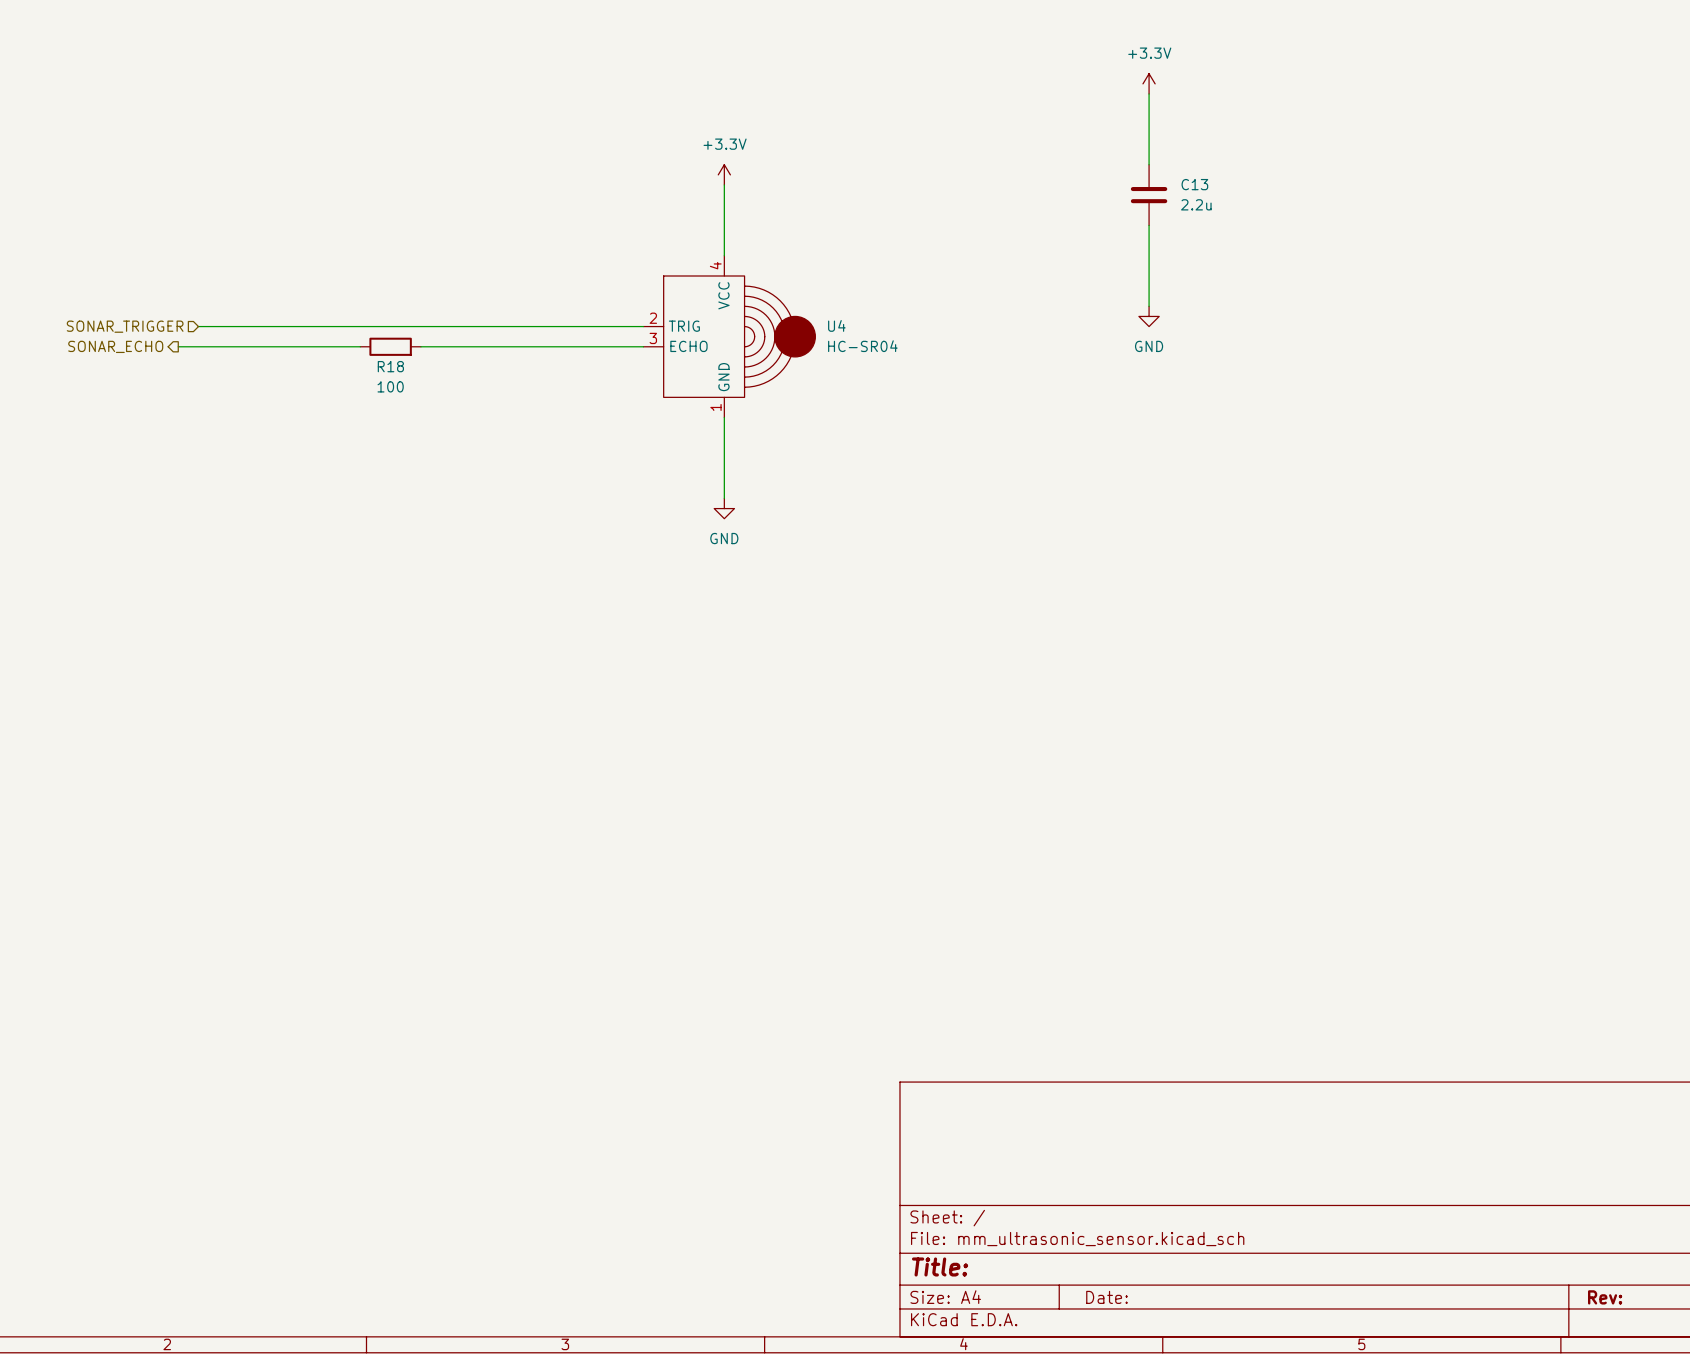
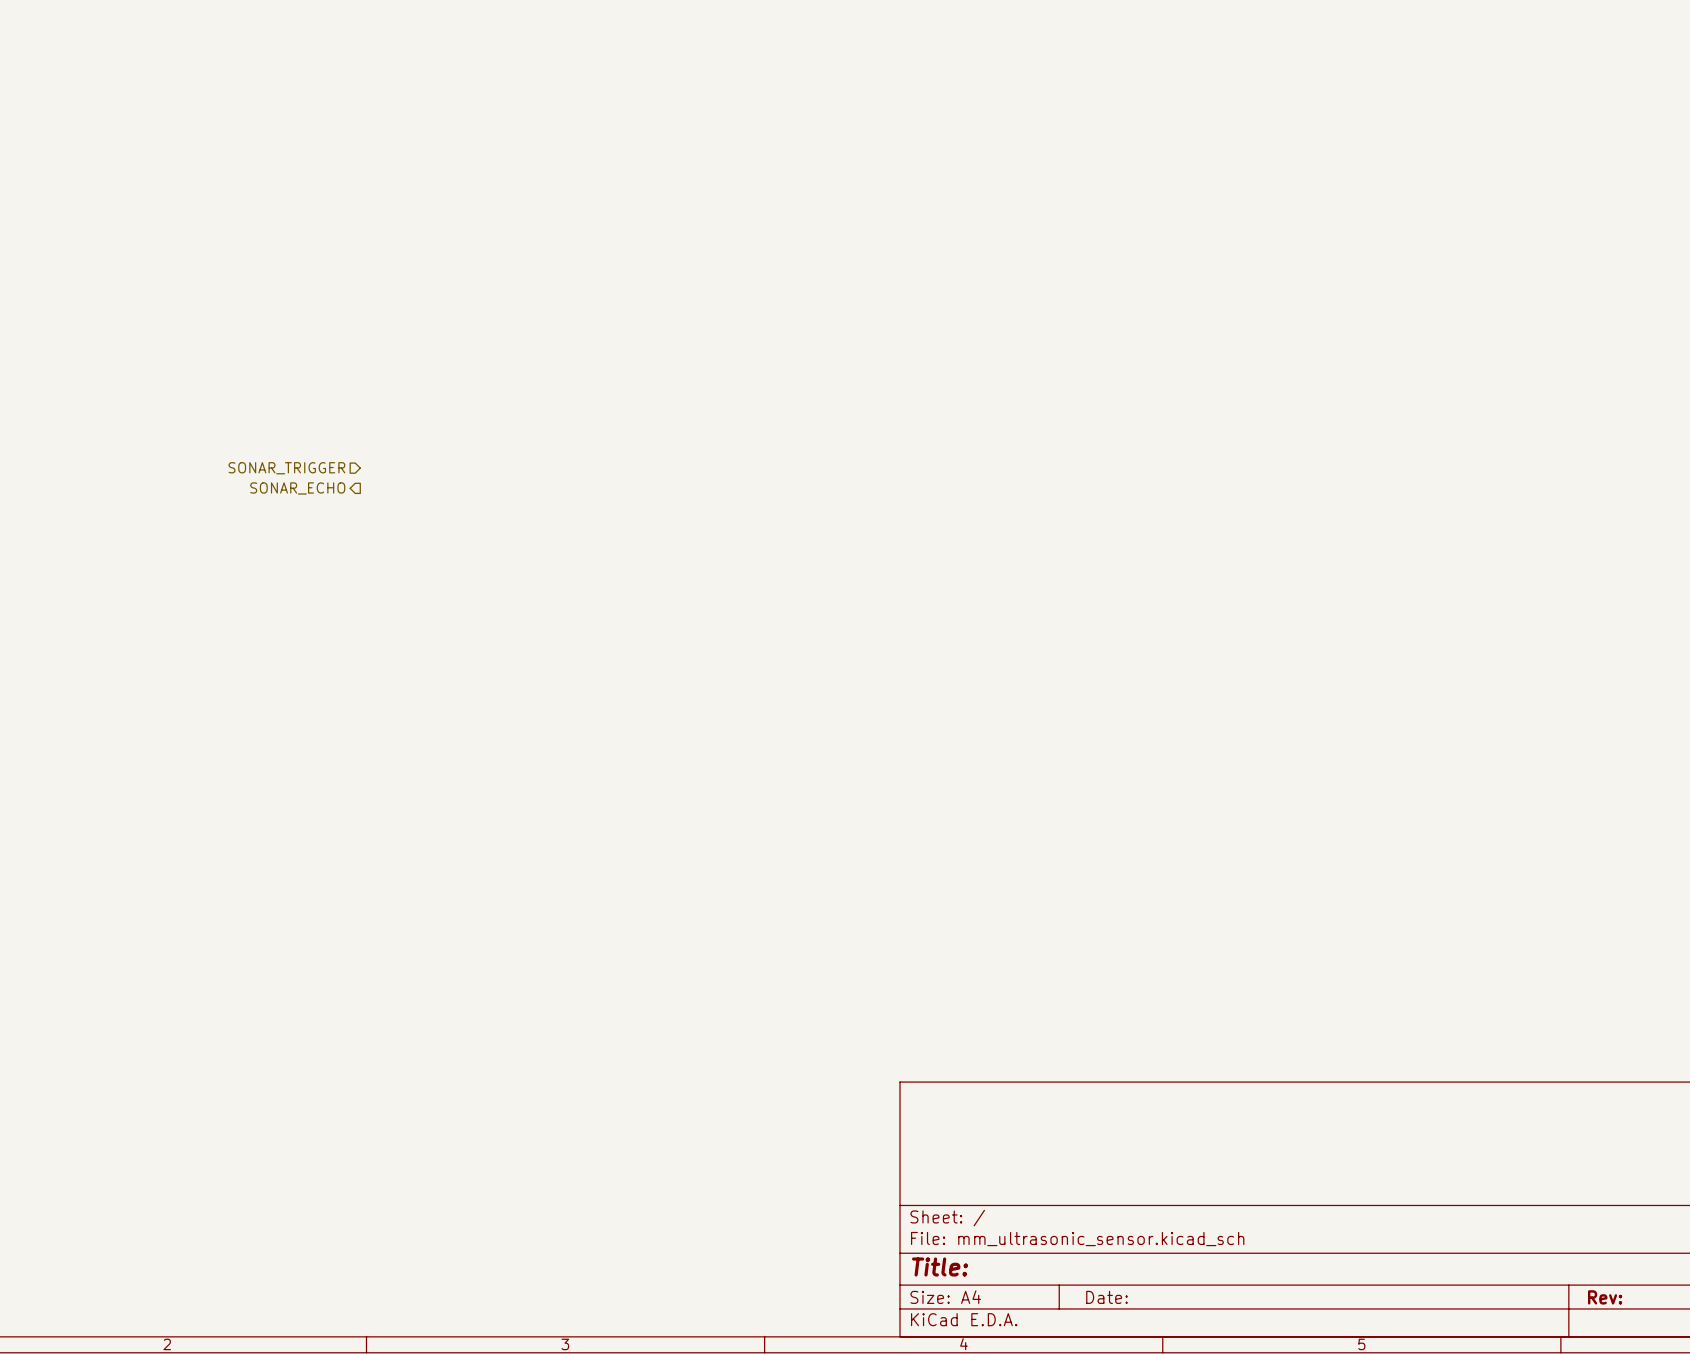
power symbol: +3.3V (1149, 83) -> none
wire: (1149, 93) (1149, 164) -> none
power symbol: +3.3V (724, 174) -> none
wire: (724, 184) (724, 255) -> none
C13: 2.2u (1149, 195) -> none
wire: (1149, 225) (1149, 306) -> none
power symbol: GND (1149, 316) -> none
hierarchical label: SONAR_TRIGGER (125, 326) -> none
wire: (198, 326) (643, 326) -> none
U4: HC-SR04 (729, 336) -> none
hierarchical label: SONAR_ECHO (115, 346) -> none
wire: (178, 346) (360, 346) -> none
R18: 100 (390, 346) -> none
wire: (420, 346) (643, 346) -> none
wire: (724, 417) (724, 498) -> none
hierarchical label: none -> SONAR_TRIGGER (286, 468)
hierarchical label: none -> SONAR_ECHO (297, 488)
power symbol: GND (724, 508) -> none

